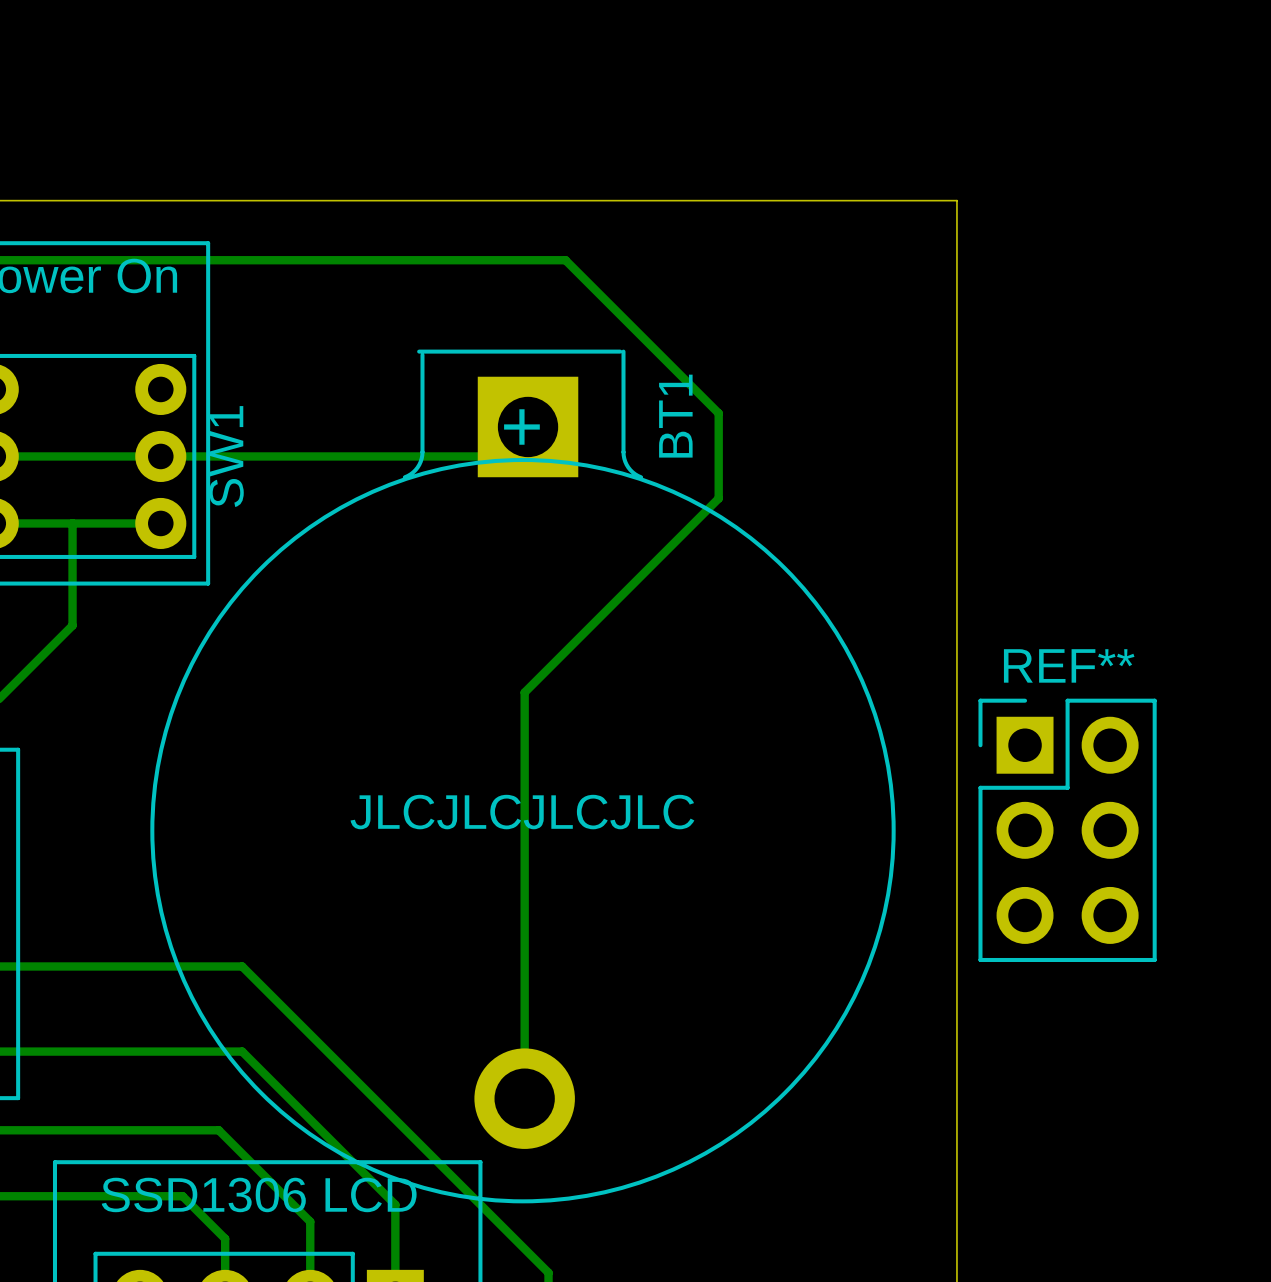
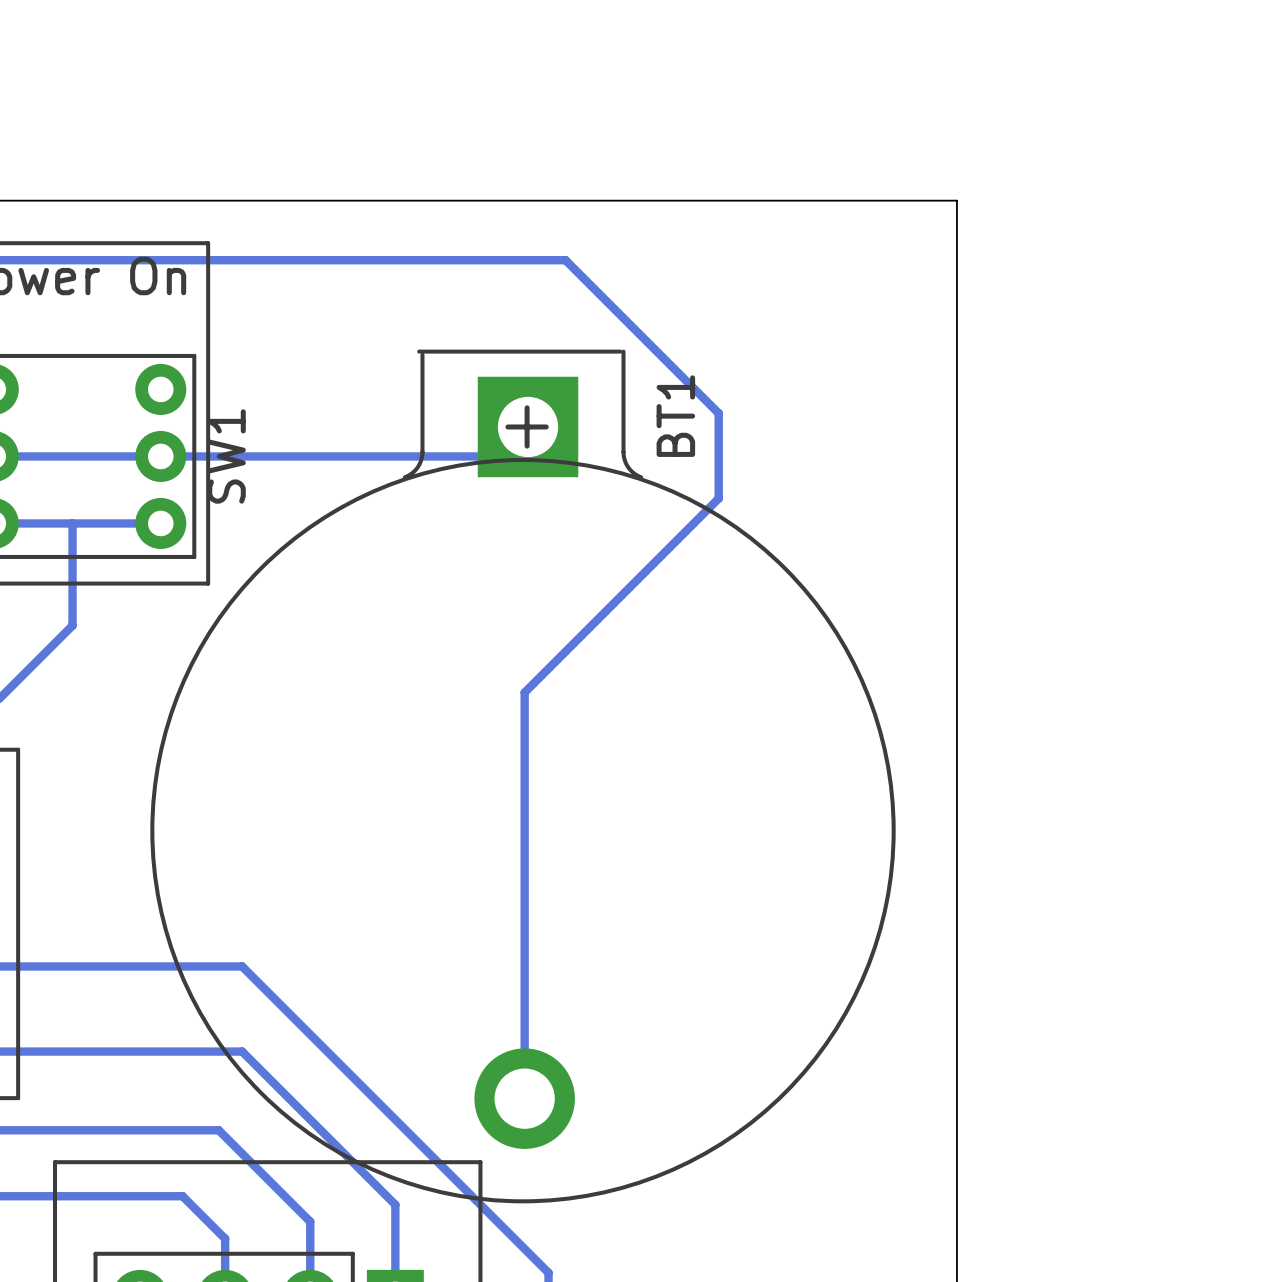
text: JLCJLCJLCJLC (522, 812) -> none
REF**: (1067, 830) -> none
text: SSD1306 LCD (259, 1194) -> none

